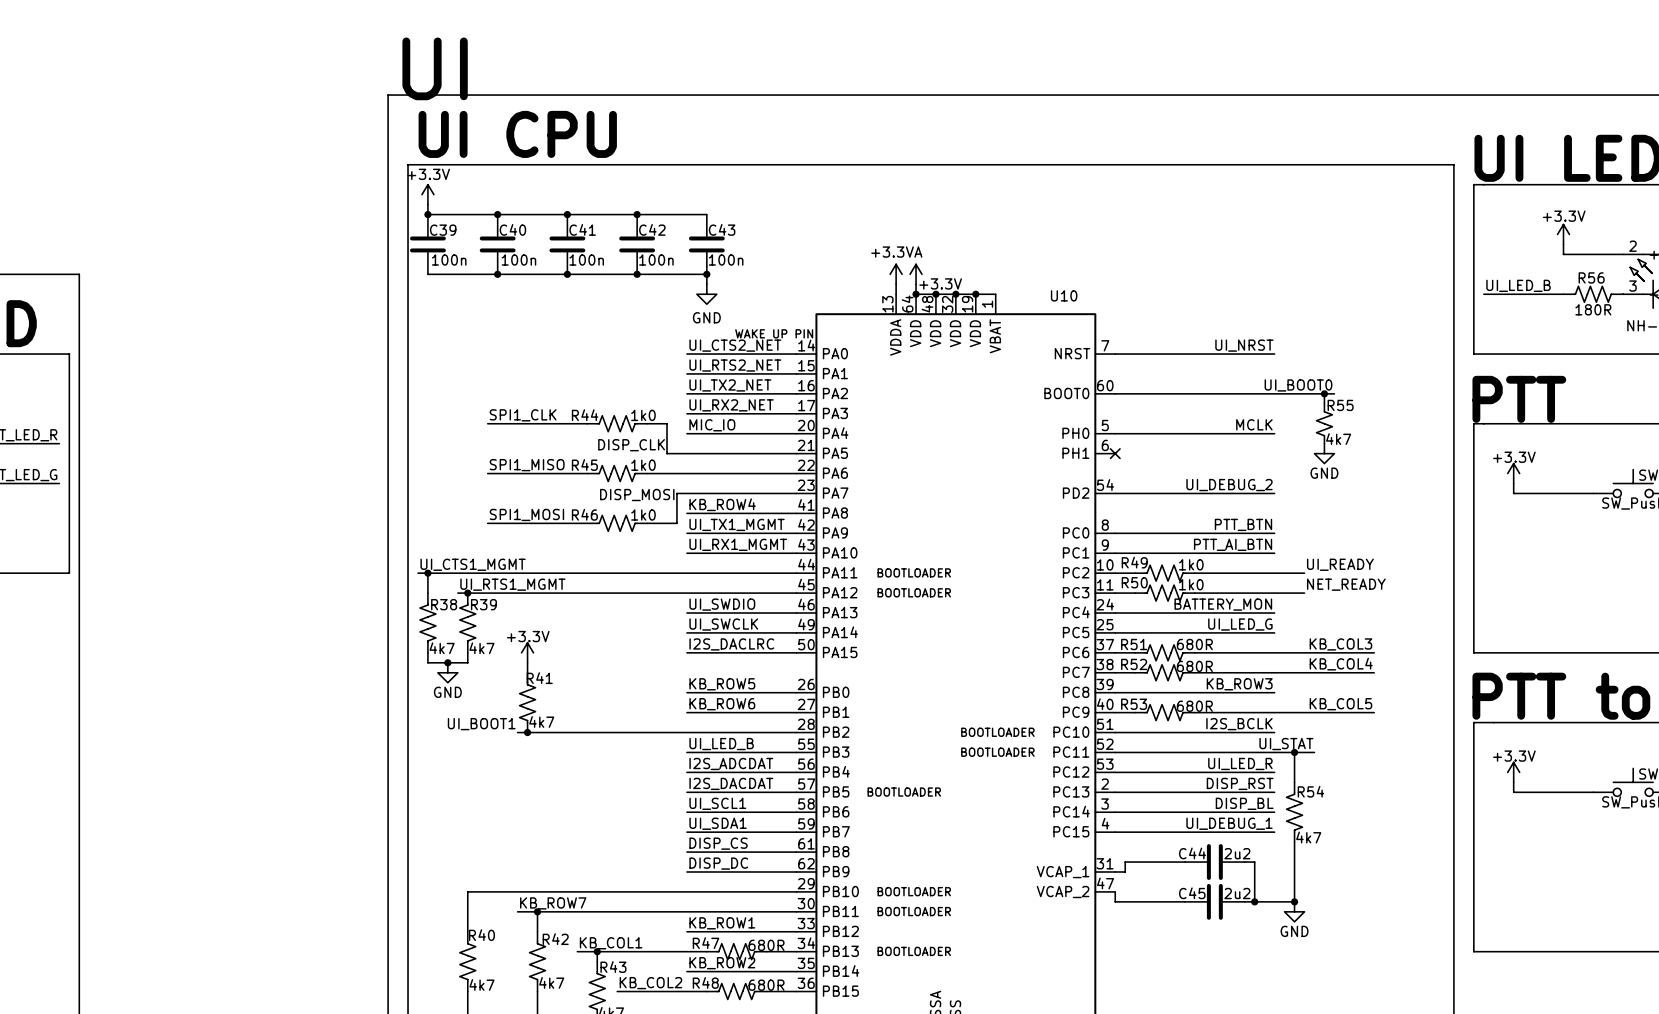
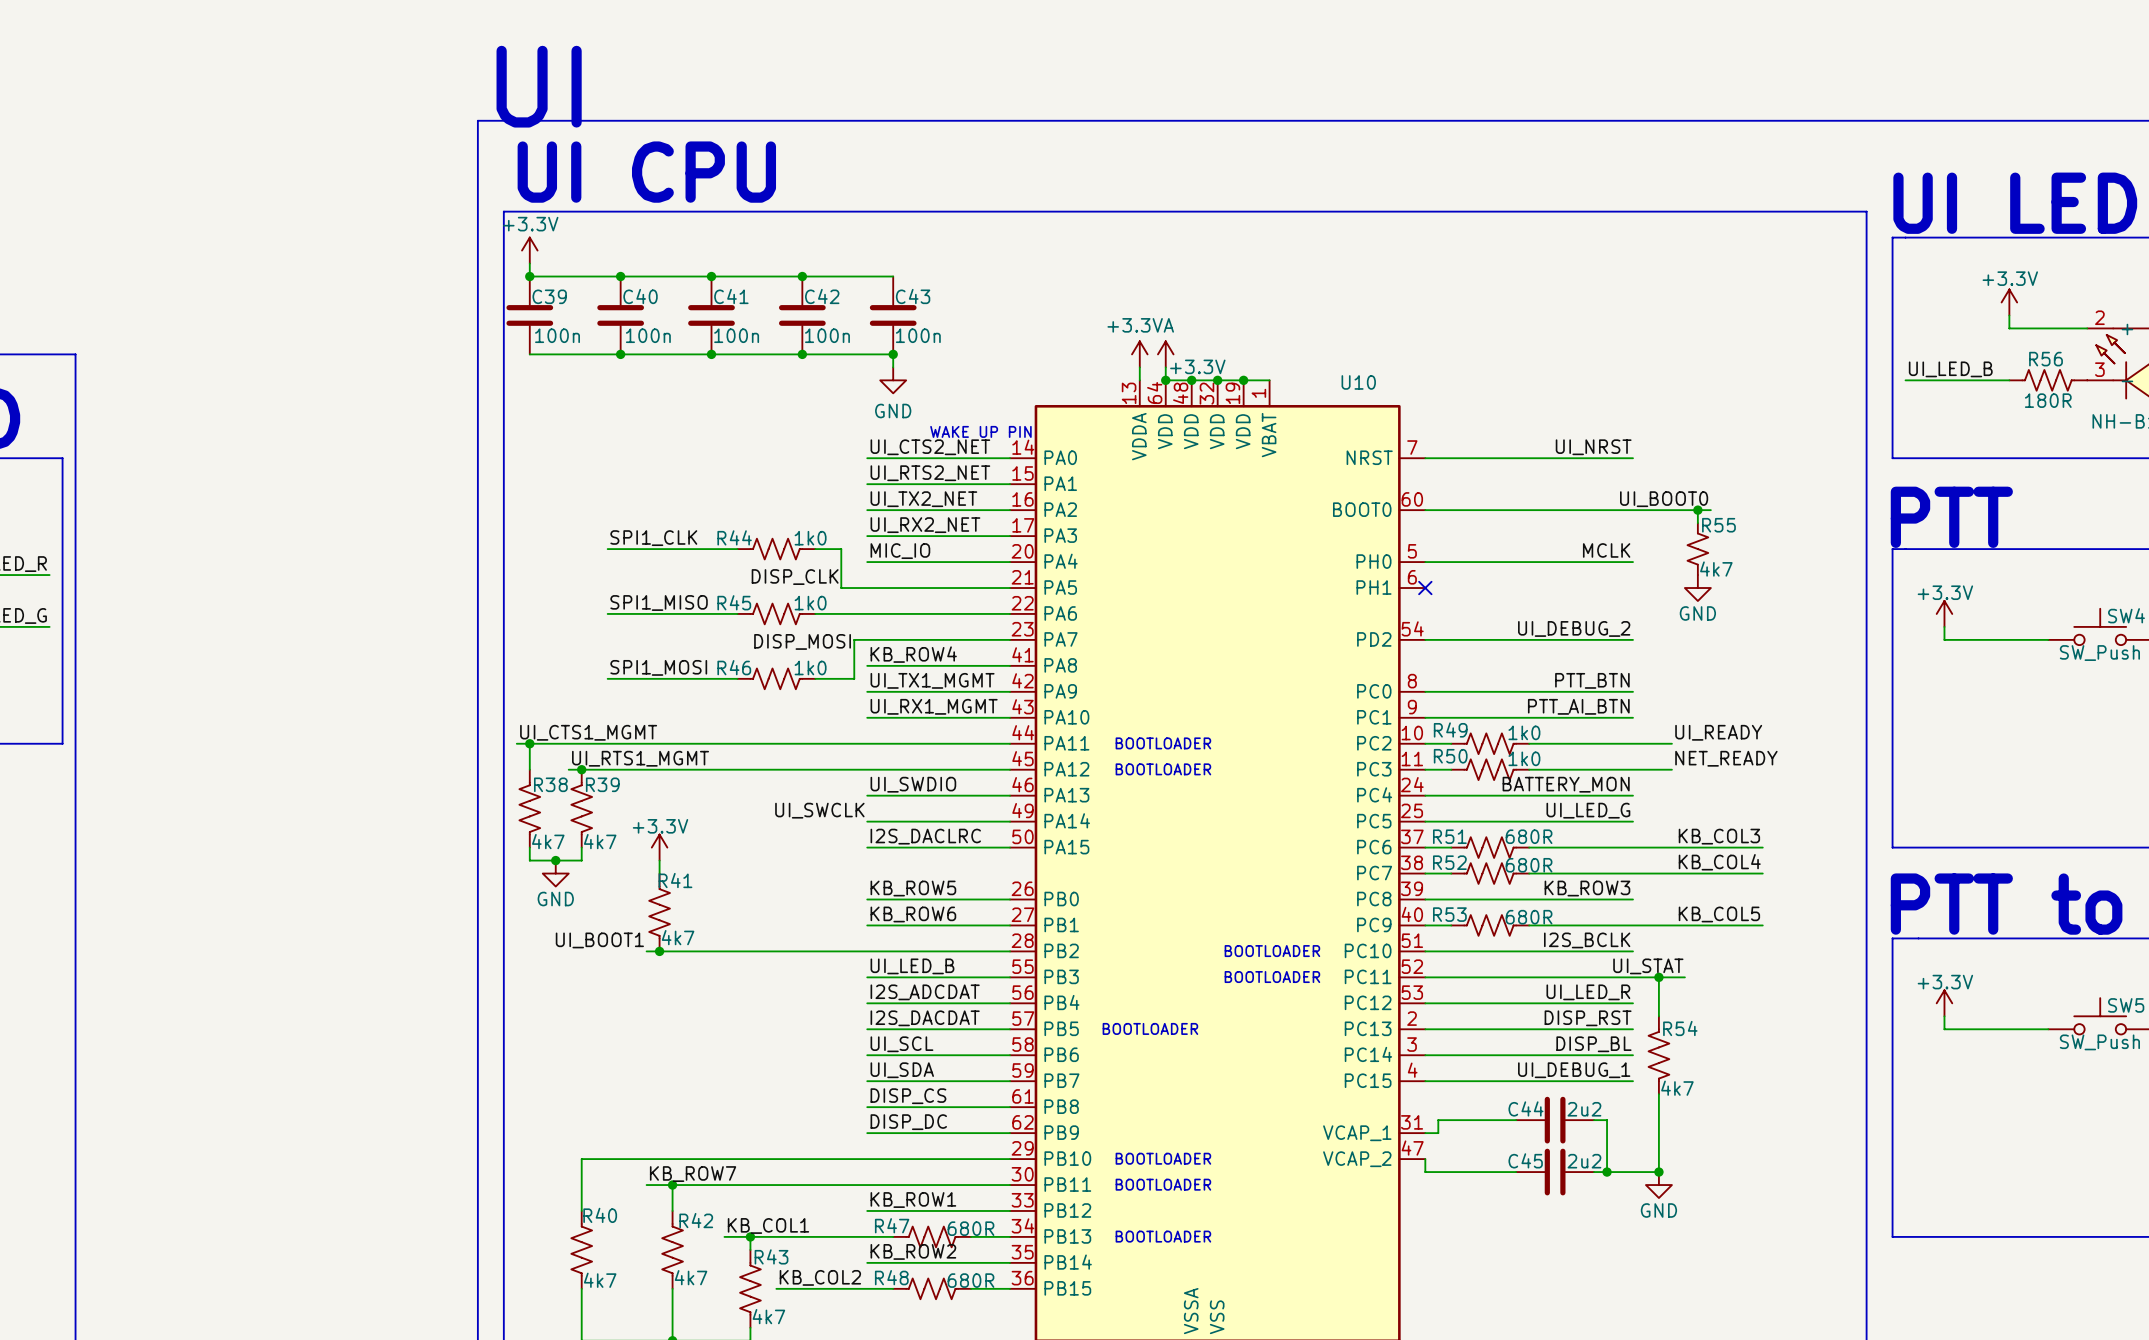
label position: UI_SWCLK (723, 624) -> UI_SWCLK (819, 810)
label: UI_SCL1 (717, 803) -> UI_SCL (901, 1044)
label: UI_SDA1 (718, 823) -> UI_SDA (902, 1070)

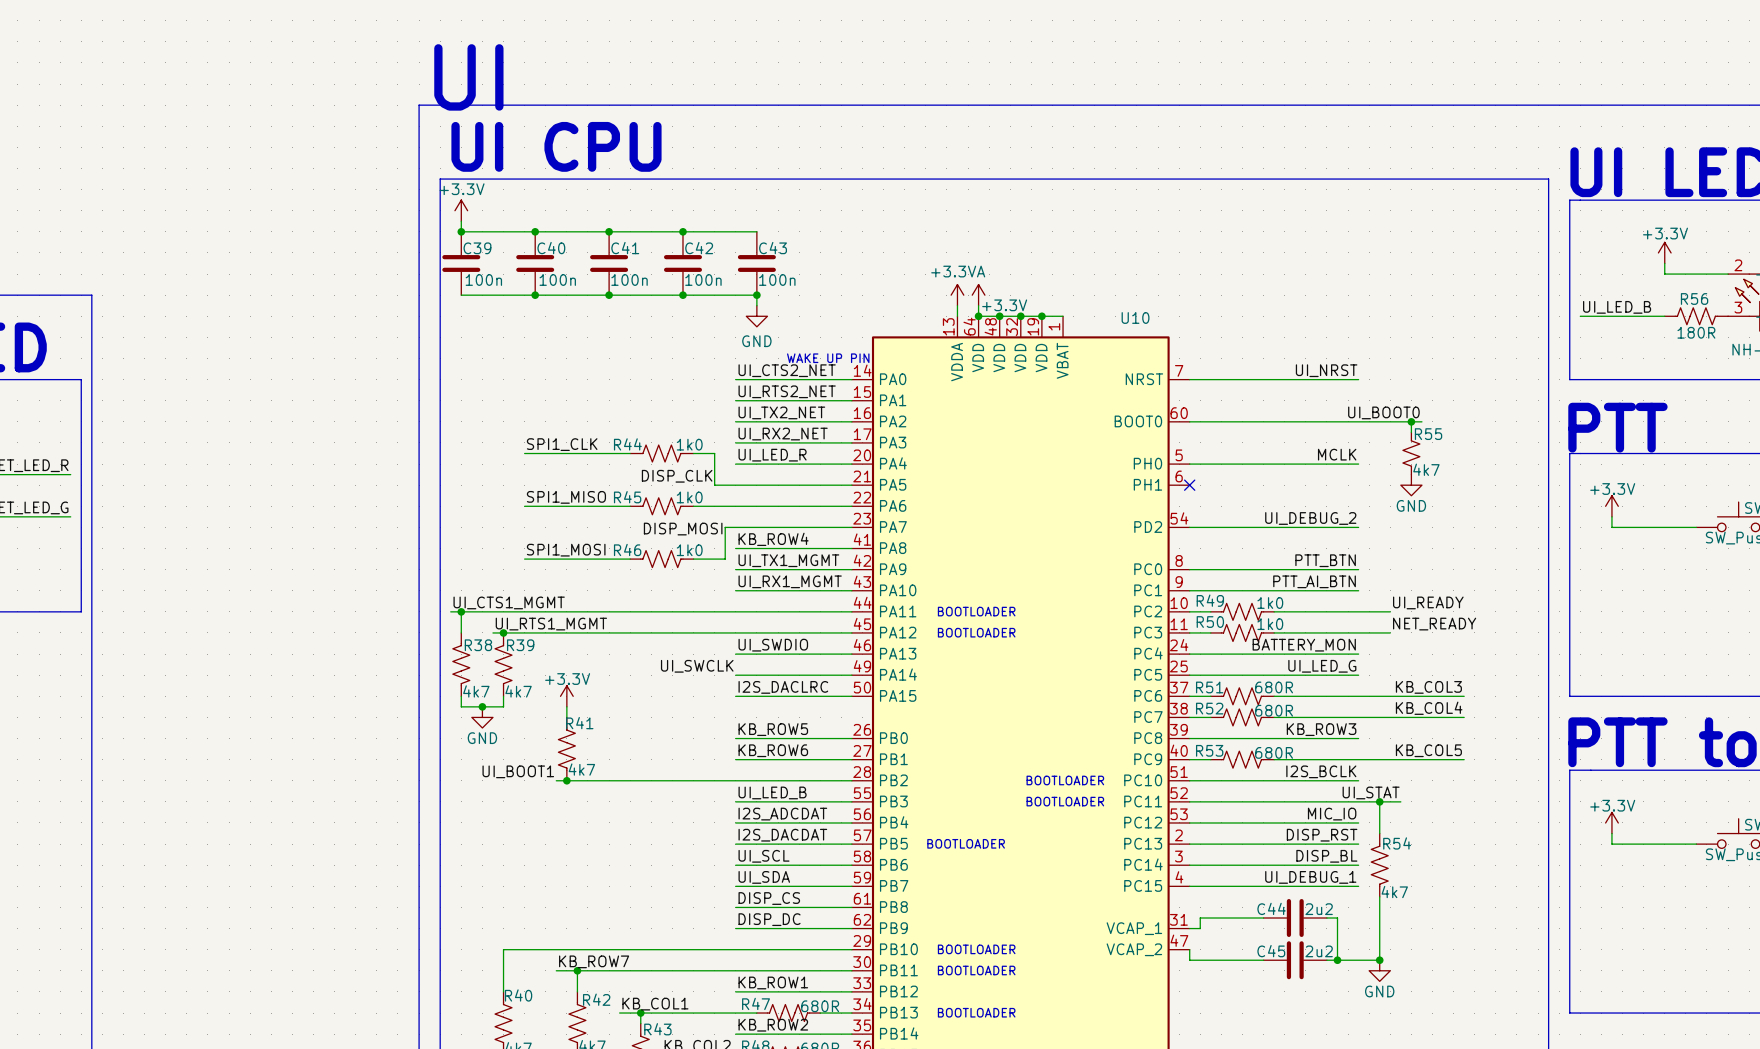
label: MIC_IO (900, 551) -> UI_LED_R (772, 455)
label: UI_LED_R (1588, 992) -> MIC_IO (1332, 814)

